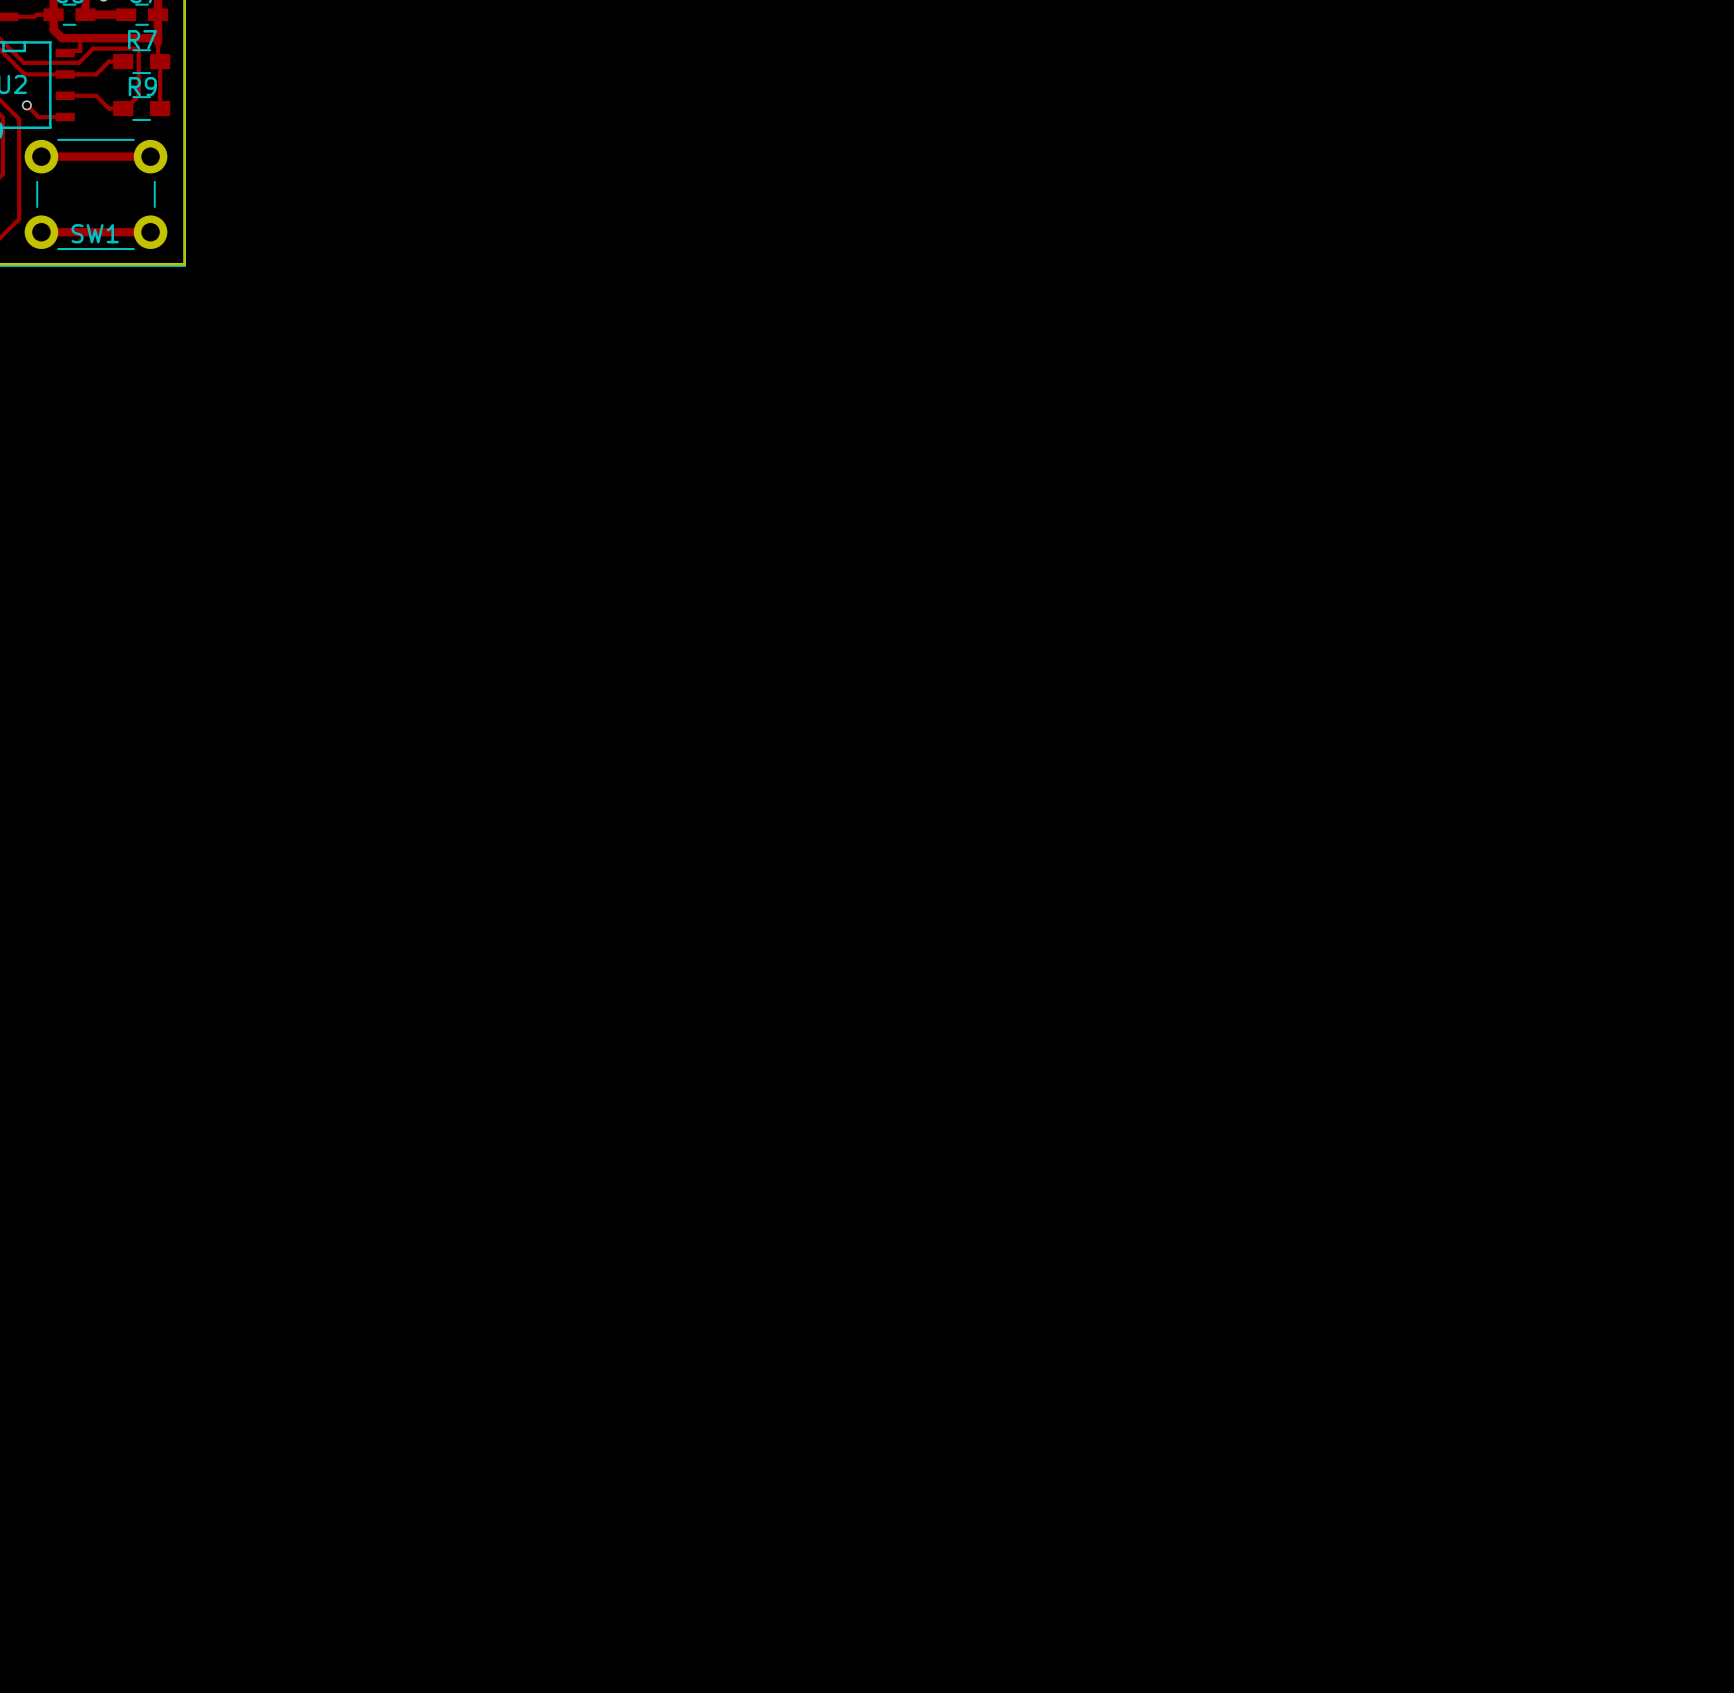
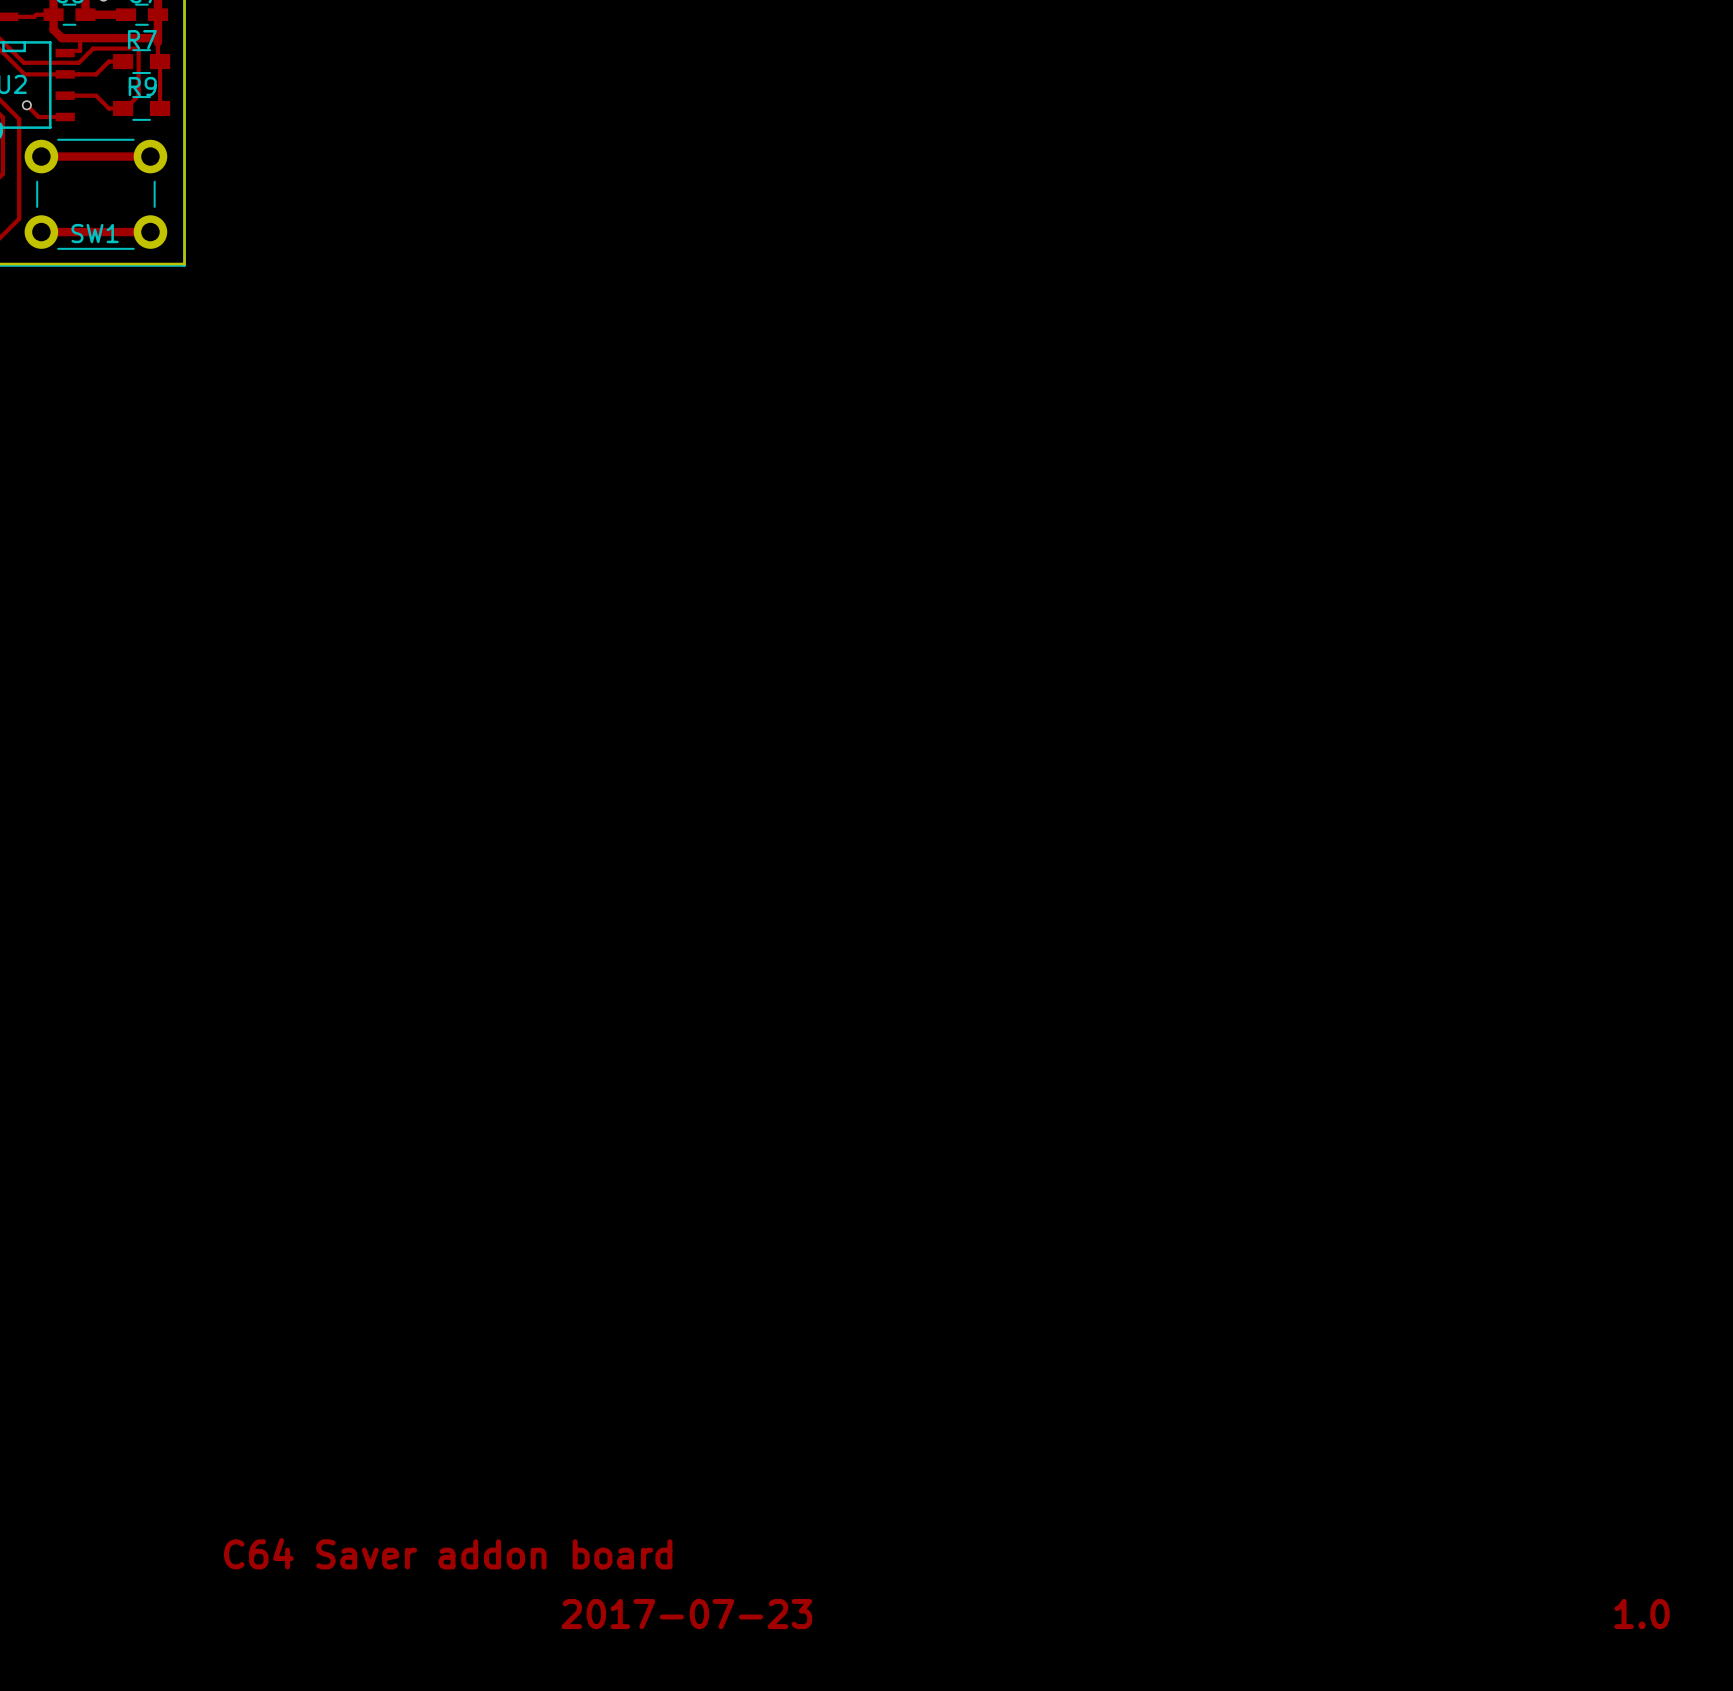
text: none -> C64 Saver addon board (448, 1553)
text: none -> 2017-07-23 (686, 1614)
text: none -> 1.0 (1642, 1614)

